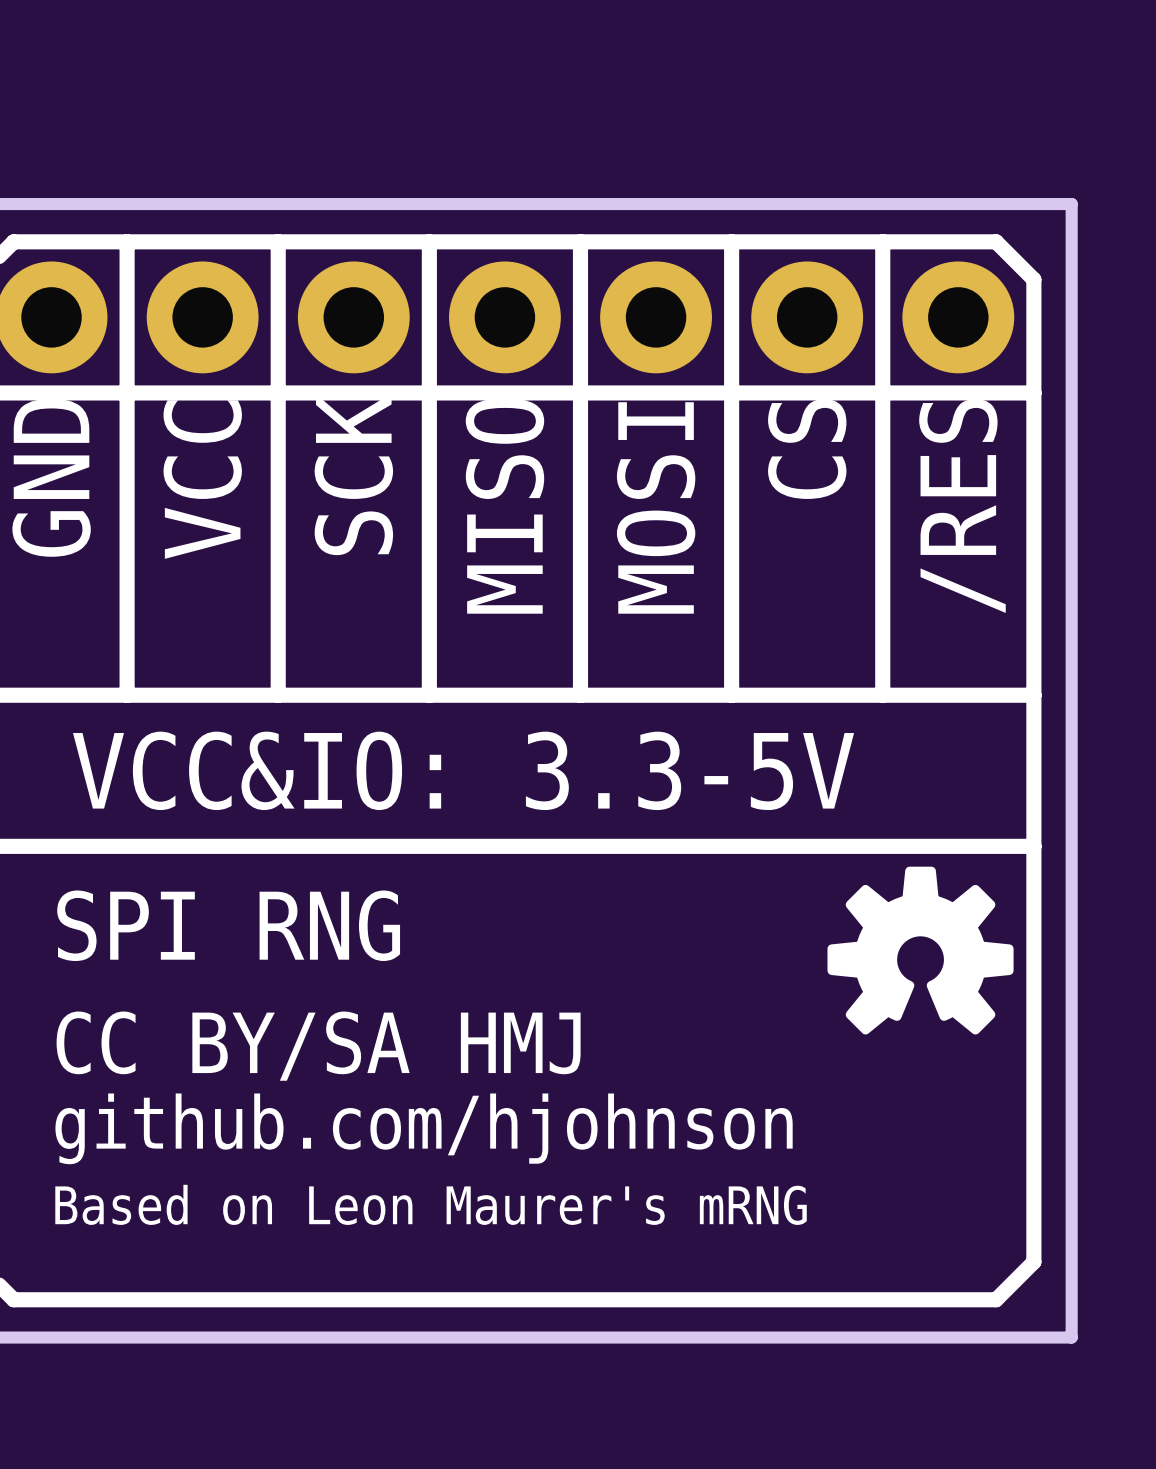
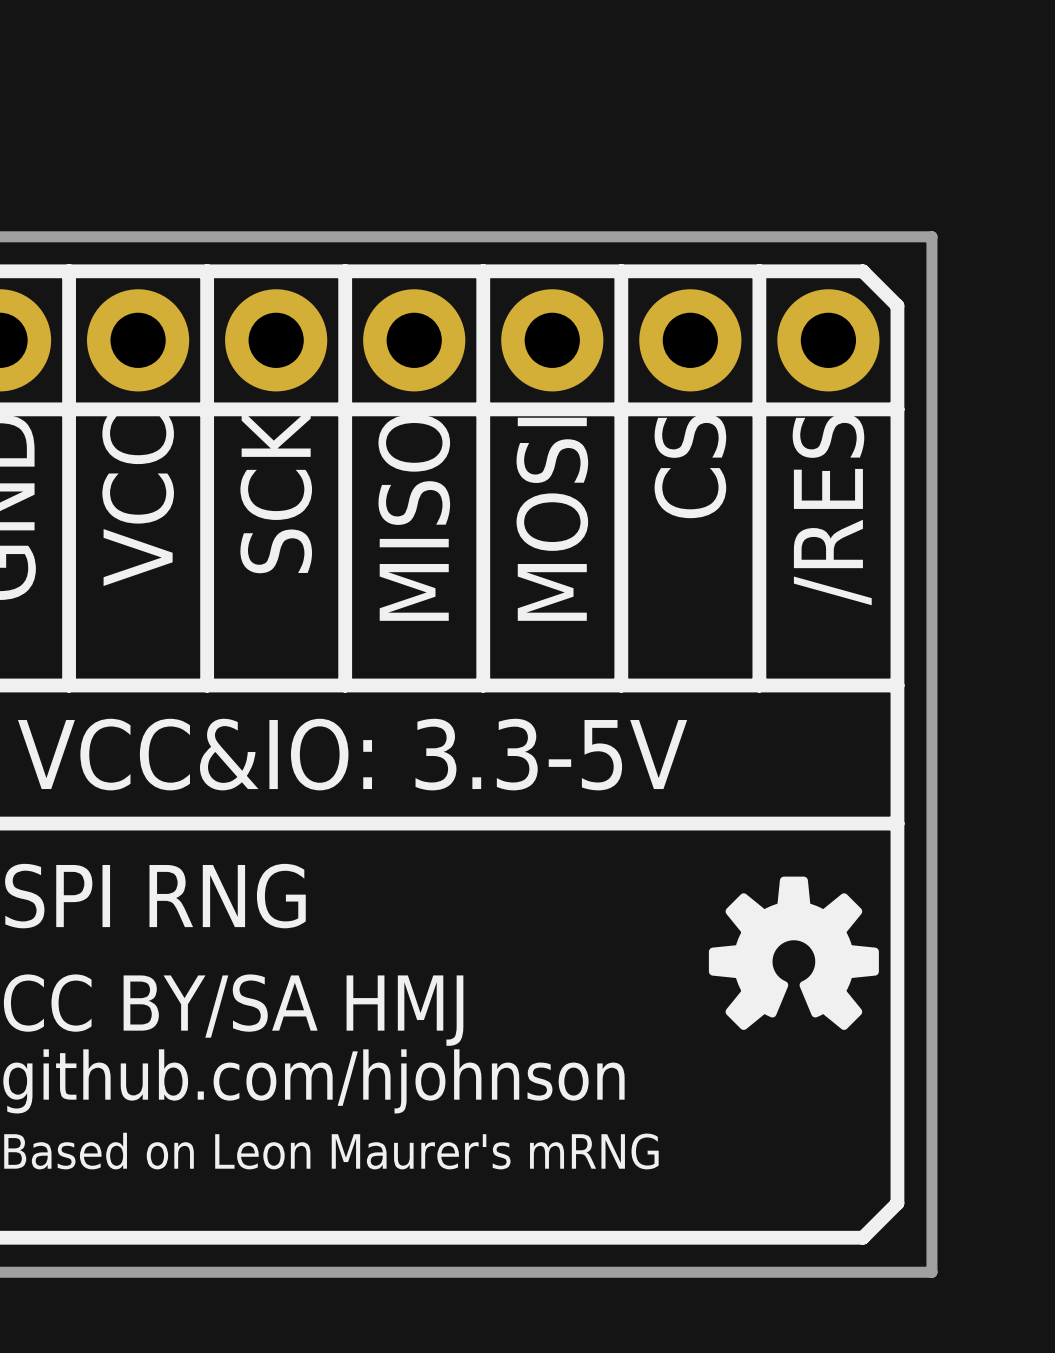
drawing position: (920, 950) -> (793, 953)

